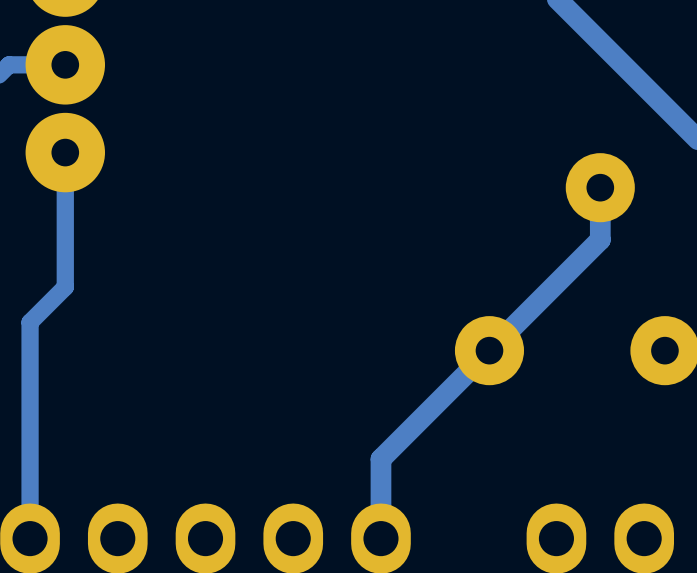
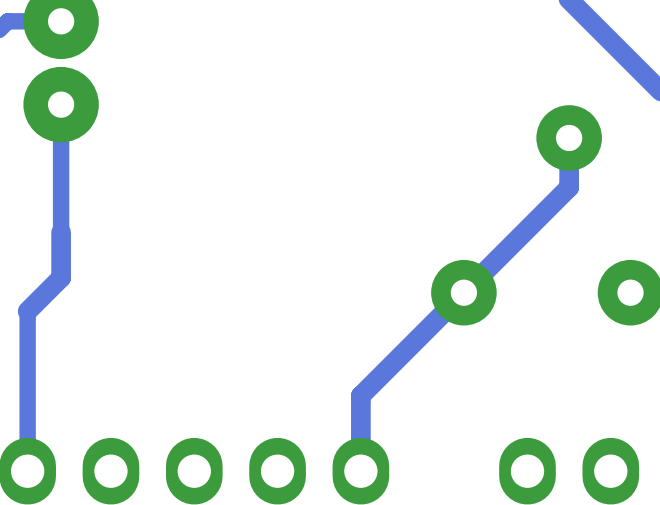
bottom track: (65, 287) (30, 322) (30, 370) -> (61, 232) (61, 277) (27, 311)

